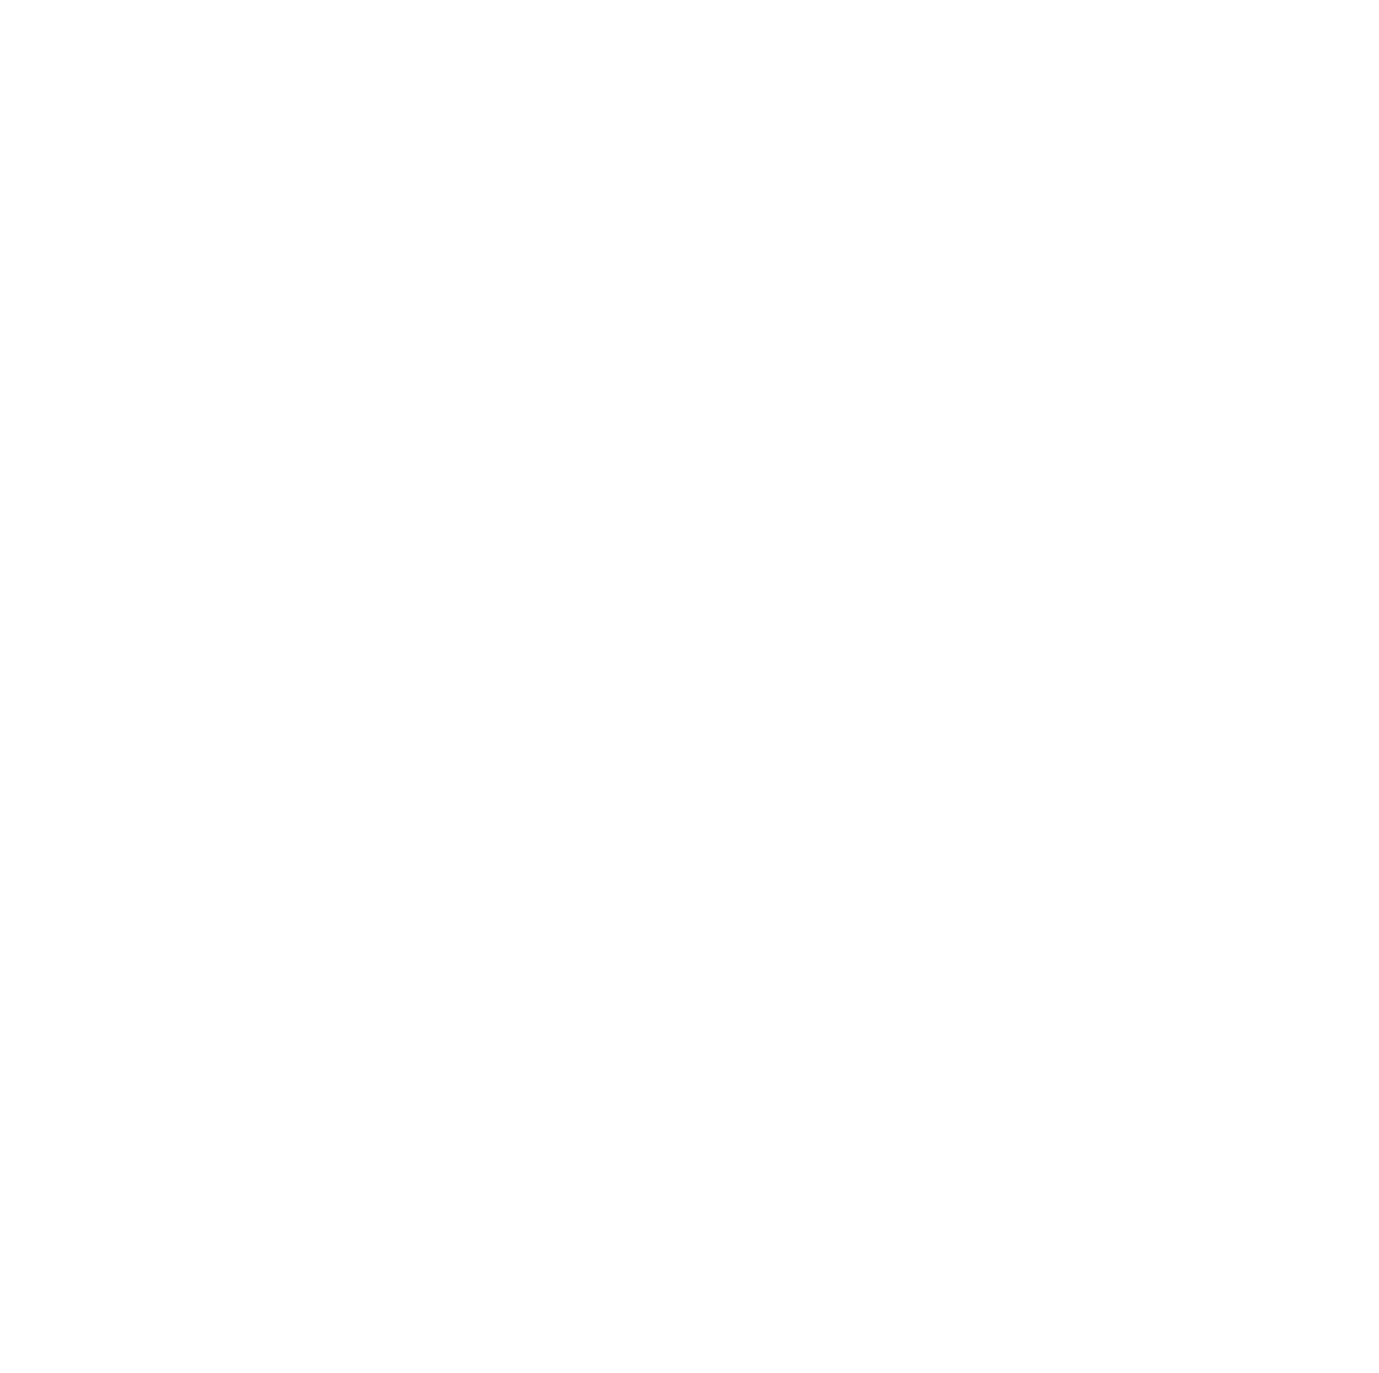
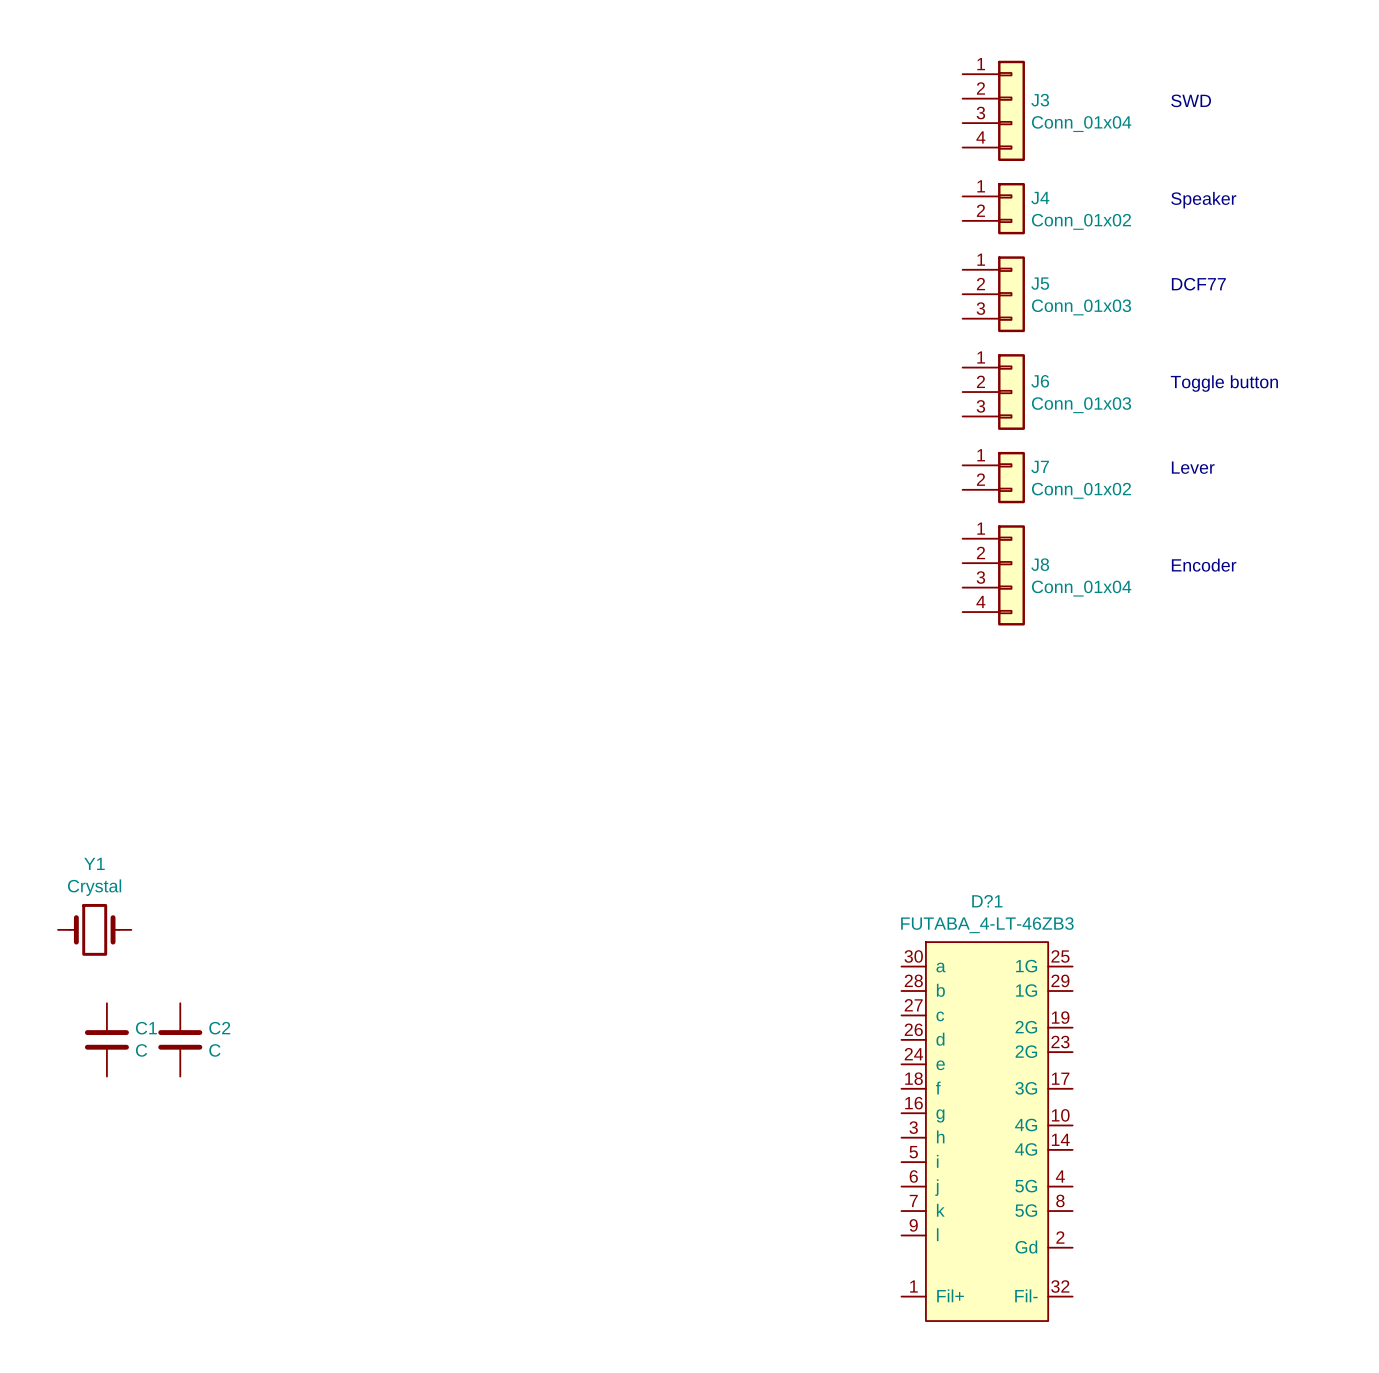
text: none -> SWD (1191, 100)
J3: none -> Conn_01x04 (993, 110)
text: none -> Speaker (1203, 200)
J4: none -> Conn_01x02 (993, 208)
text: none -> DCF77 (1198, 284)
J5: none -> Conn_01x03 (993, 294)
text: none -> Toggle button (1224, 383)
J6: none -> Conn_01x03 (993, 392)
text: none -> Lever (1193, 467)
J7: none -> Conn_01x02 (993, 477)
text: none -> Encoder (1204, 565)
J8: none -> Conn_01x04 (993, 575)
Y1: none -> Crystal (94, 929)
C1: none -> C (106, 1039)
C2: none -> C (180, 1039)
D?1: none -> FUTABA_4-LT-46ZB3 (987, 1131)

